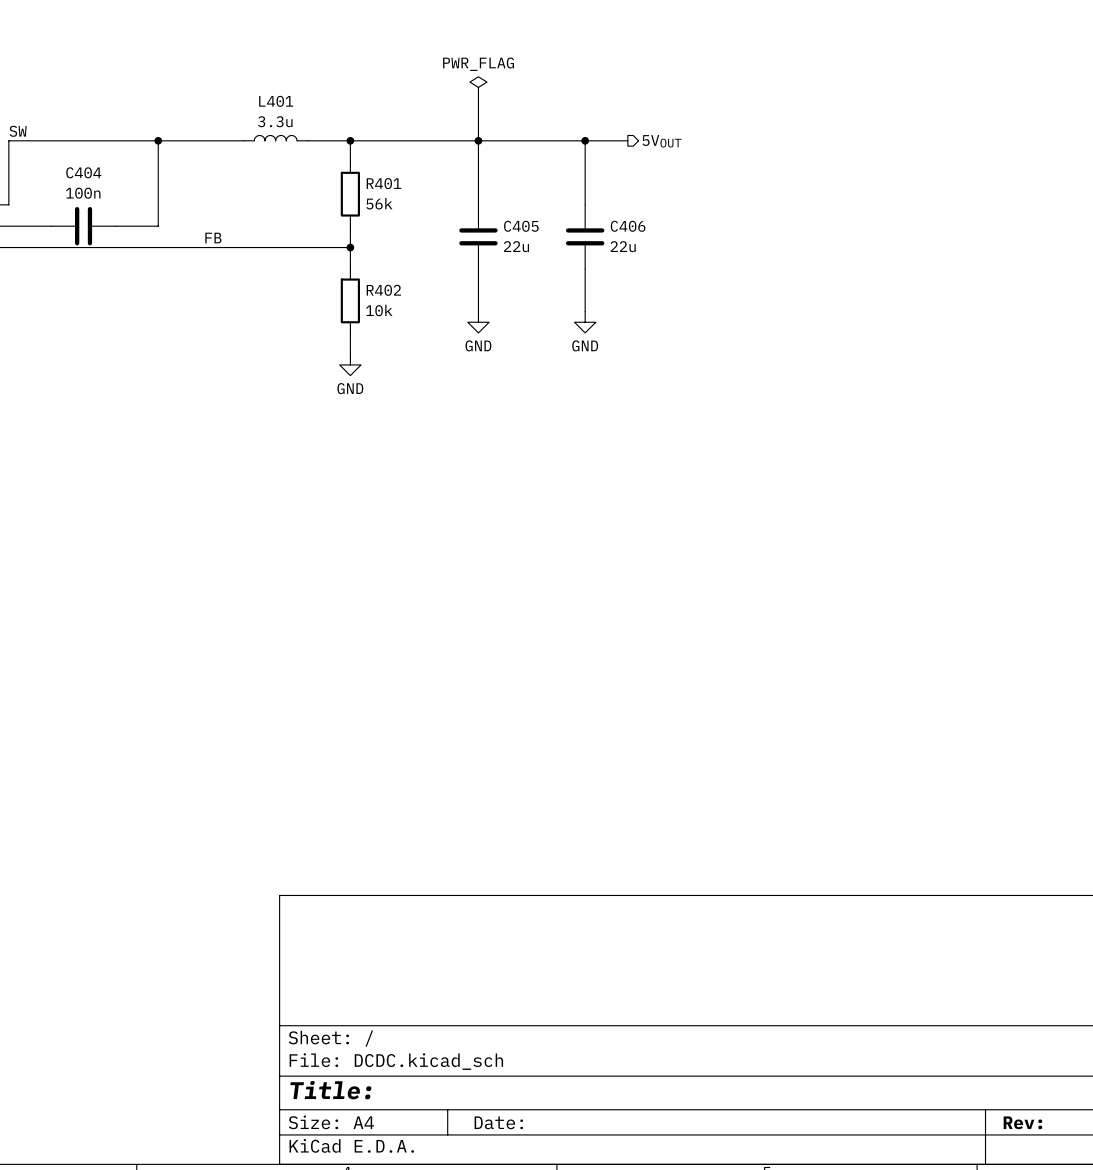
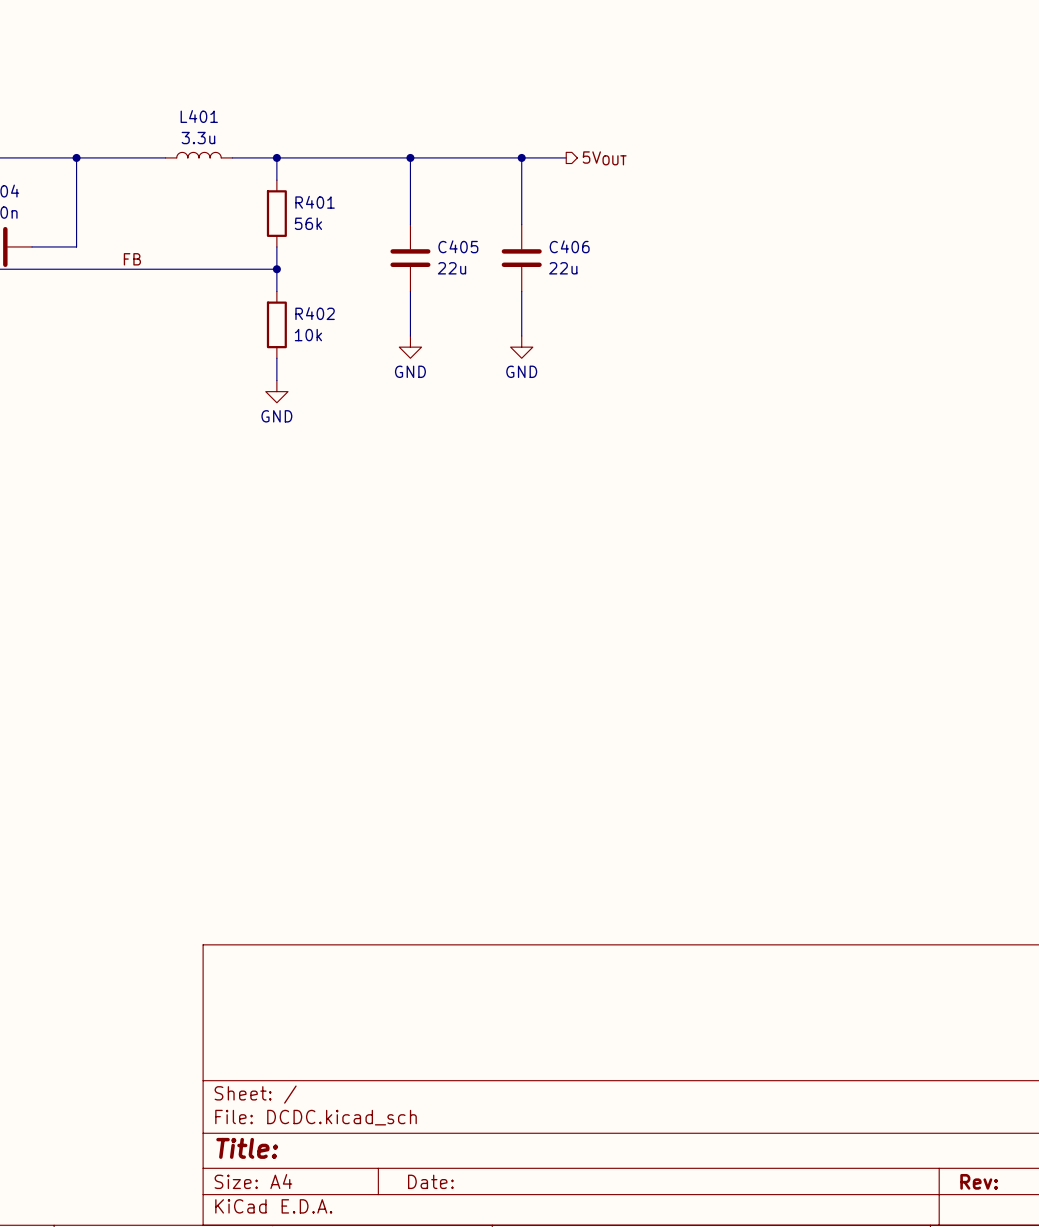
power symbol: PWR_FLAG (478, 87) -> none
wire: (478, 98) (478, 140) -> none

